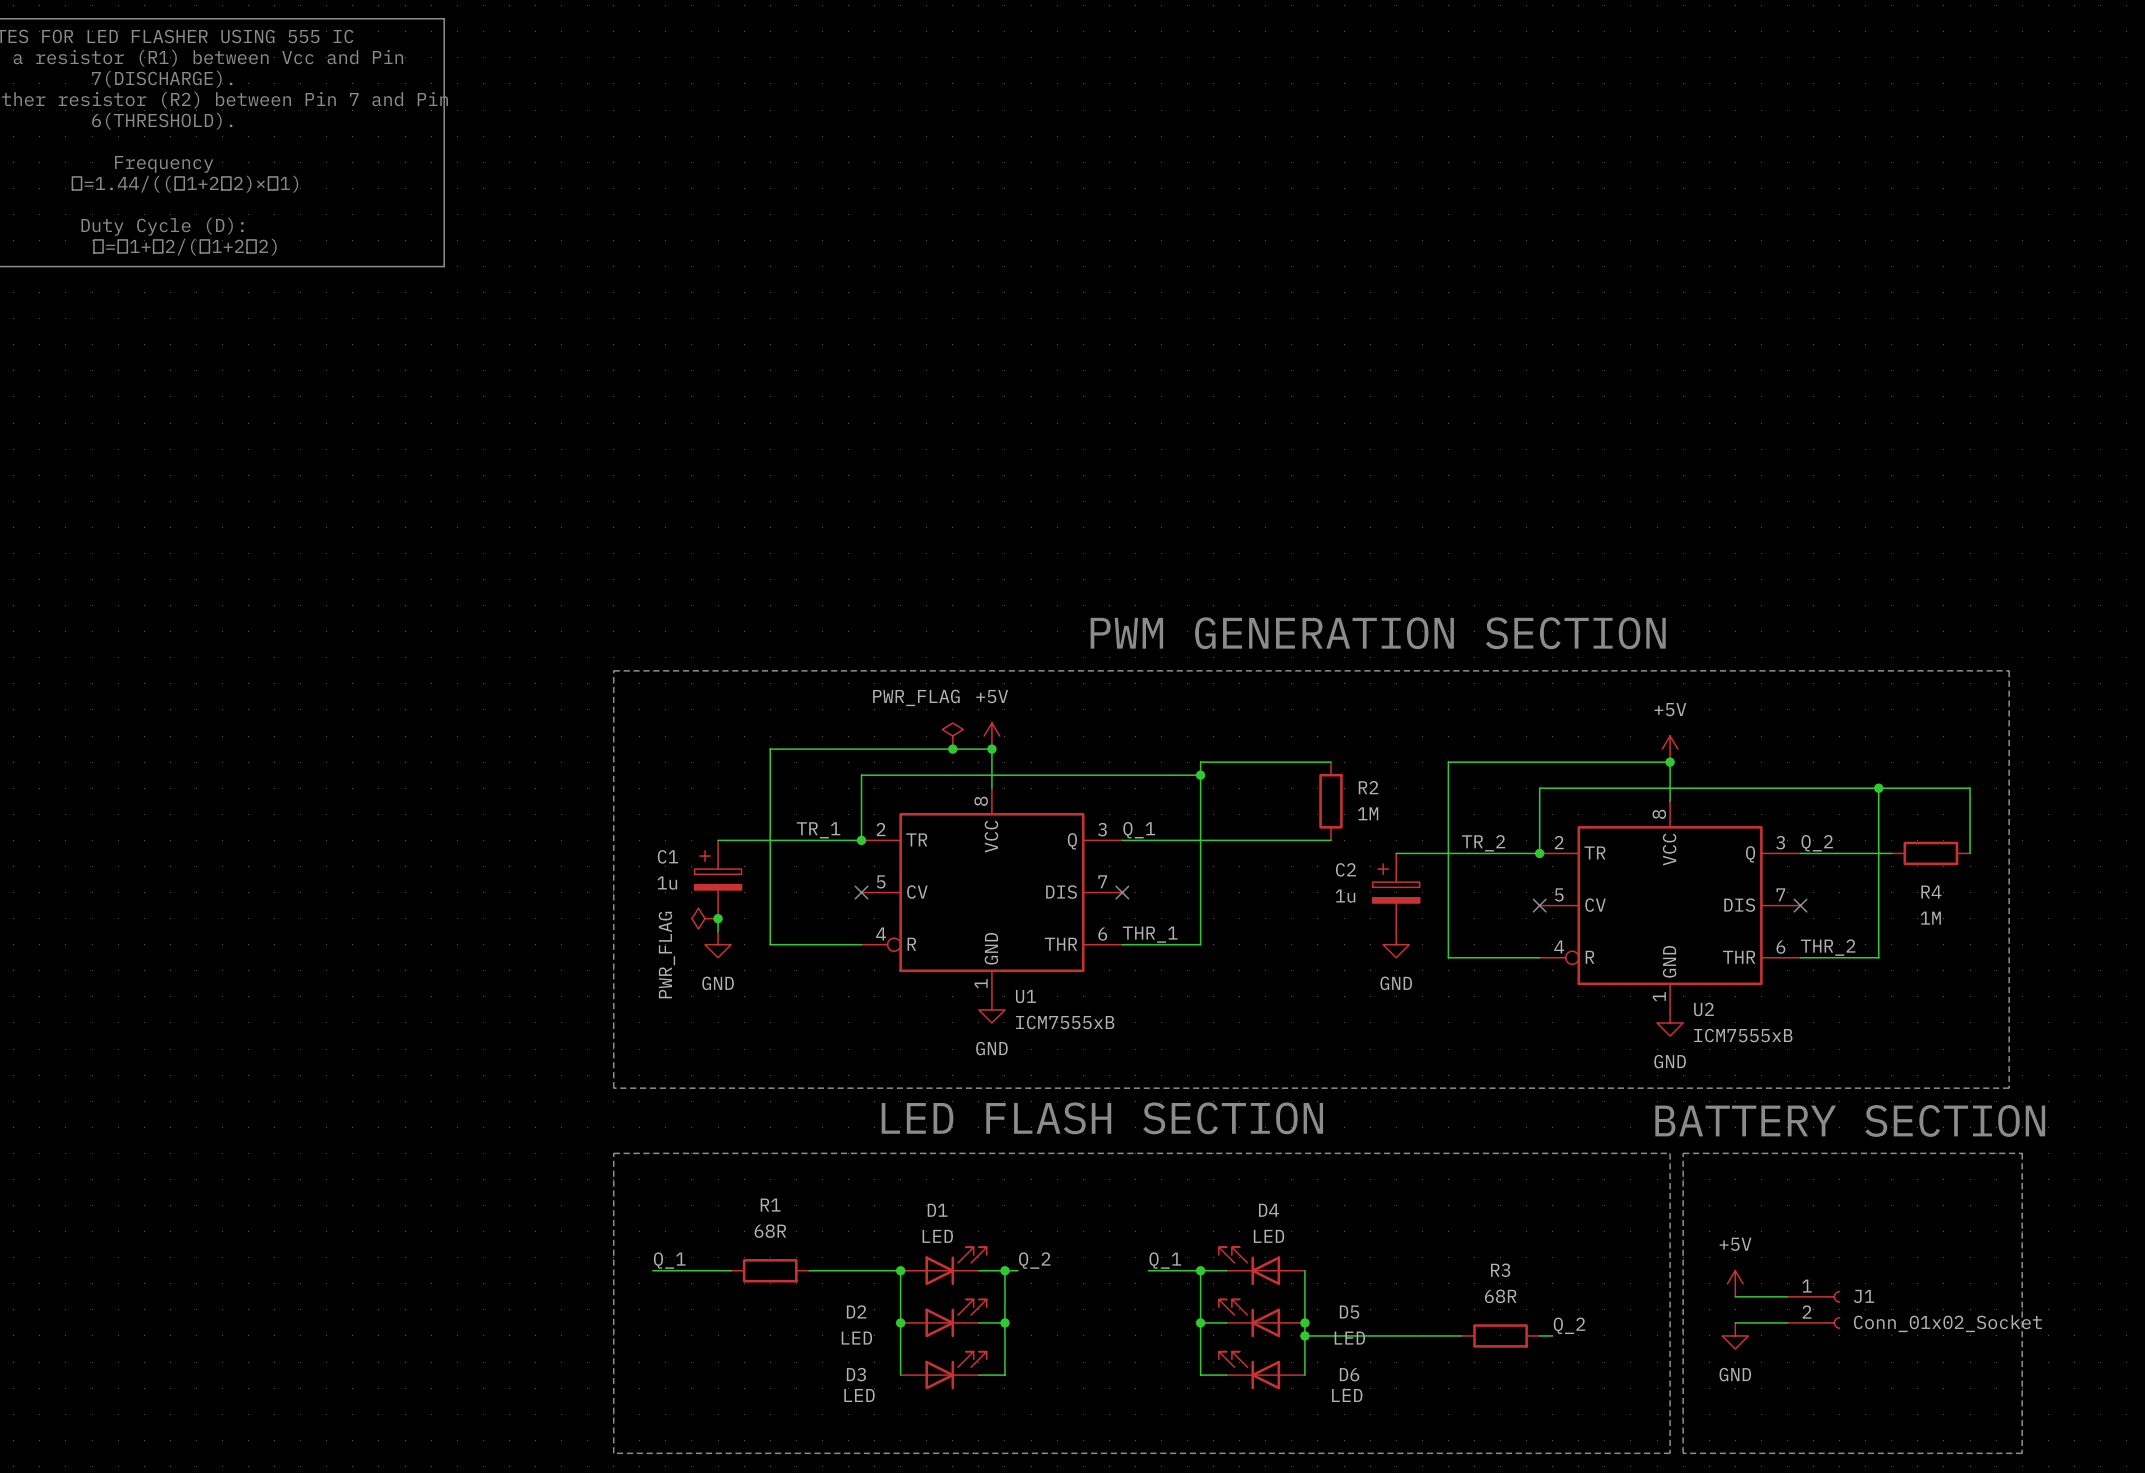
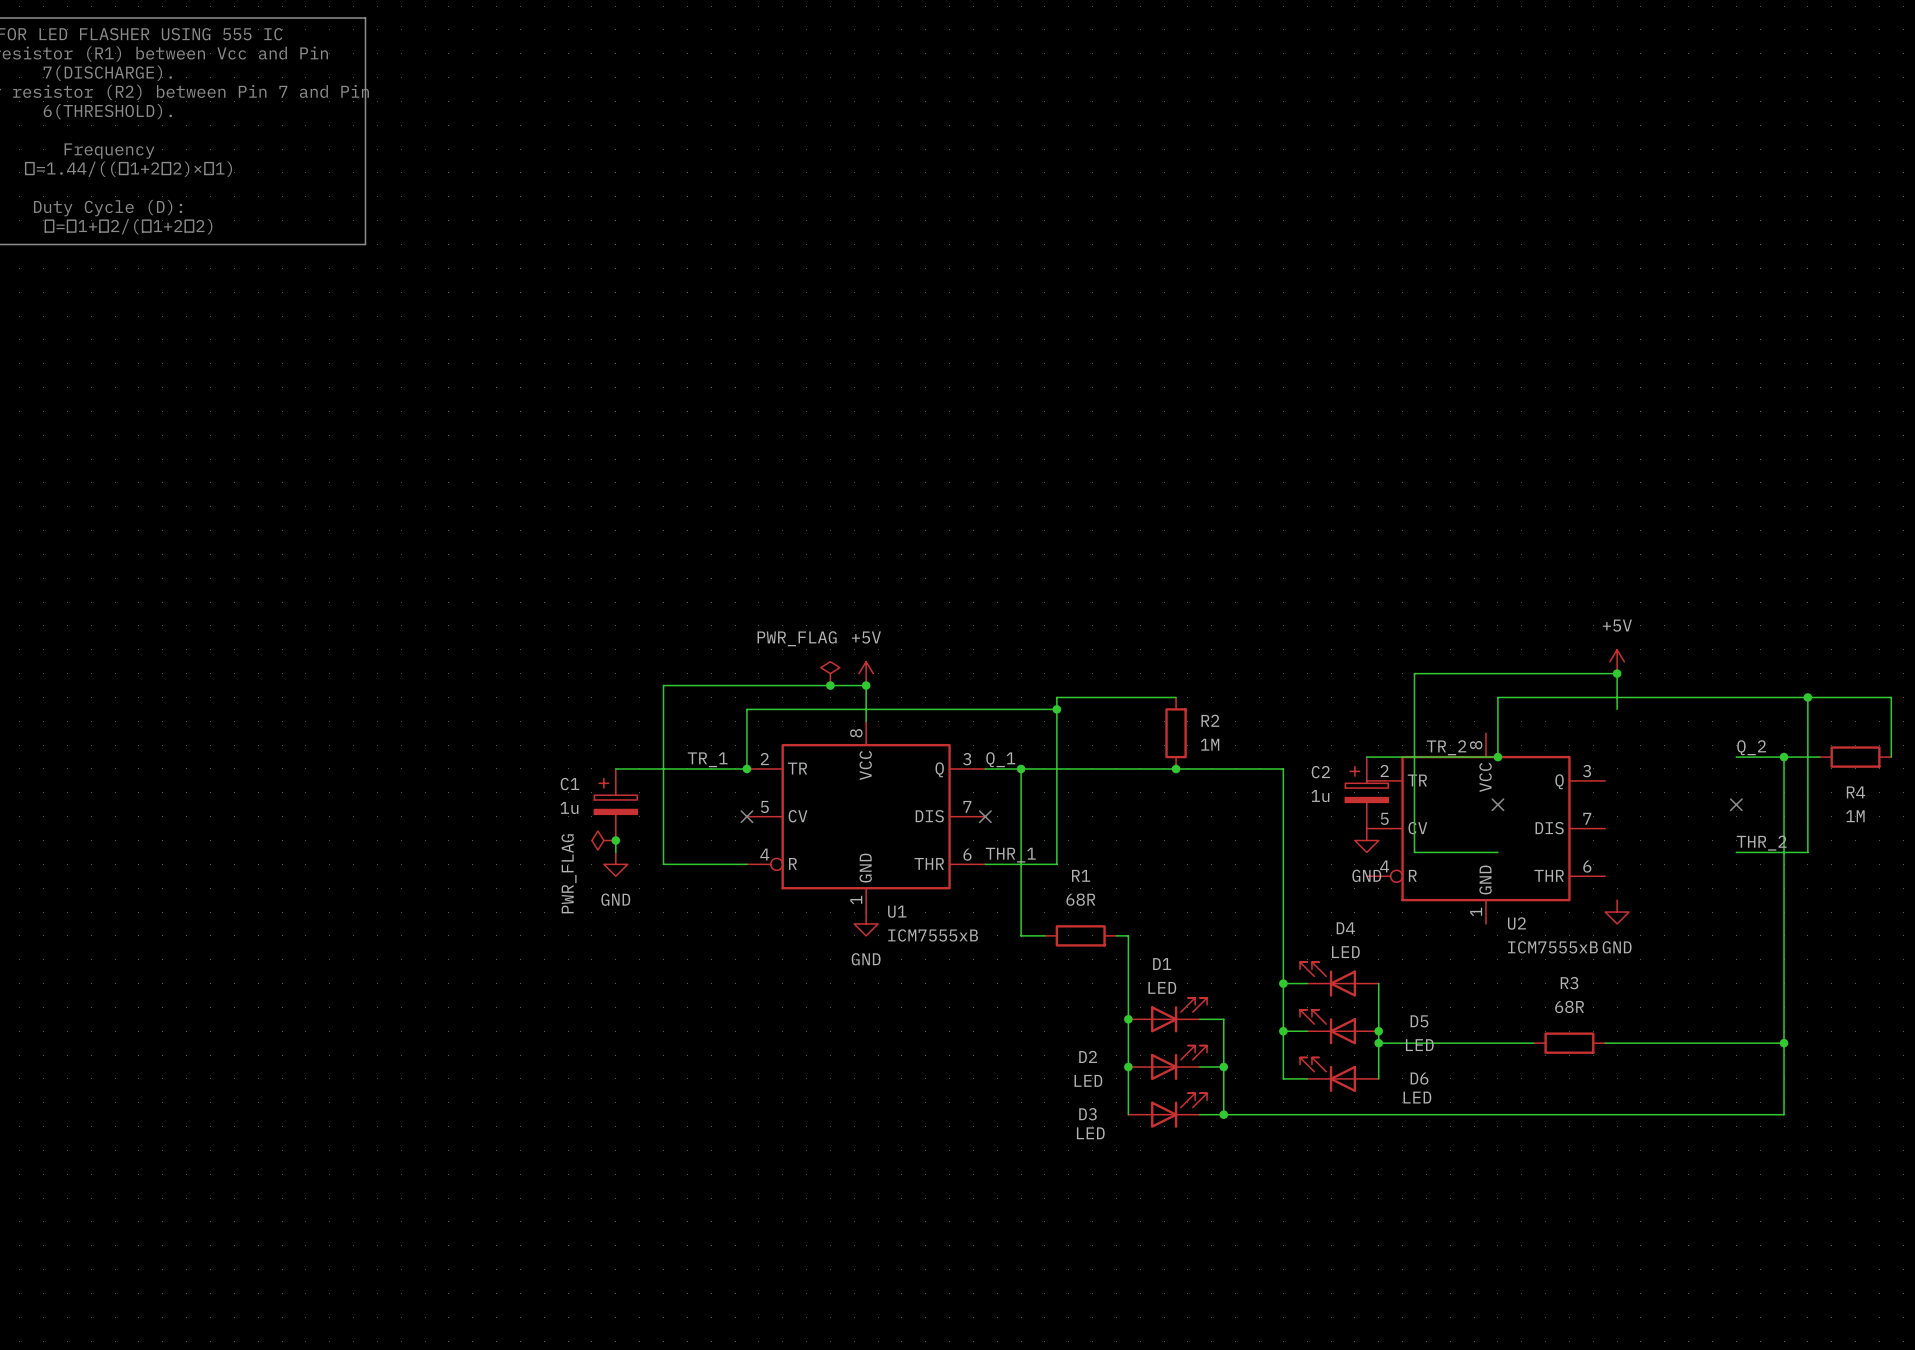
text: PWM GENERATION SECTION (1378, 633) -> none
line: (613, 670) (2009, 670) (2009, 1088) (613, 1088) (613, 670) -> none
junction: none -> (1617, 673)
power symbol position: +5V (1670, 749) -> +5V (1617, 661)
junction: (1670, 762) -> none
junction: none -> (1807, 697)
wire: none -> (1617, 709) (1617, 673) (1414, 673) (1414, 852) (1497, 852)
wire: (1878, 788) (1878, 957) (1800, 957) -> (1807, 697) (1807, 852) (1736, 852)
junction: (1878, 788) -> none
wire: (1670, 801) (1670, 762) (1448, 762) (1448, 840) -> (1176, 768) (1283, 768)
junction: none -> (1497, 757)
wire: none -> (1784, 757) (1784, 1114) (1199, 1114)
junction: none -> (1784, 757)
wire: none -> (1021, 768) (1021, 935) (1044, 935)
junction: none -> (1021, 768)
junction: none -> (1176, 768)
label position: TR_2 (1483, 843) -> TR_2 (1446, 747)
label position: Q_2 (1817, 843) -> Q_2 (1751, 747)
wire: (1396, 853) (1539, 853) (1539, 788) (1970, 788) (1970, 853) -> (1366, 757) (1497, 757) (1497, 697) (1891, 697) (1891, 757)
junction: (1539, 853) -> none
wire: (1800, 853) (1891, 853) -> (1736, 757) (1819, 757)
R4 position: (1930, 853) -> (1855, 757)
no-connect mark: none -> (1497, 804)
no-connect mark: none -> (1736, 804)
C2 position: (1396, 892) -> (1366, 792)
no-connect mark: (1539, 905) -> none
no-connect mark: (1800, 905) -> none
power symbol: none -> GND (1366, 840)
power symbol: GND (1396, 944) -> none
label position: THR_2 (1828, 947) -> THR_2 (1761, 843)
wire: (1448, 957) (1539, 957) -> (1283, 876) (1283, 1078) (1307, 1078)
power symbol: none -> GND (1617, 912)
wire: none -> (1116, 935) (1128, 935) (1128, 1114)
power symbol: GND (1670, 1022) -> none
wire: none -> (1283, 983) (1307, 983)
junction: none -> (1283, 983)
wire: none -> (1378, 983) (1378, 1078)
junction: none -> (1128, 1019)
wire: none -> (1199, 1019) (1223, 1019) (1223, 1114)
text: LED FLASH SECTION (1102, 1118) -> none
text: BATTERY SECTION (1850, 1120) -> none
wire: none -> (1283, 1031) (1307, 1031)
junction: none -> (1283, 1031)
junction: none -> (1378, 1031)
wire: none -> (1378, 1043) (1533, 1043)
junction: none -> (1378, 1043)
wire: none -> (1605, 1043) (1784, 1043)
junction: none -> (1784, 1043)
line: (613, 1153) (613, 1453) (1670, 1453) (1670, 1153) (613, 1153) -> none
line: (1683, 1153) (2022, 1153) (2022, 1453) (1683, 1453) (1683, 1153) -> none
junction: none -> (1128, 1067)
junction: none -> (1223, 1067)
junction: none -> (1223, 1114)
label: Q_1 (669, 1260) -> none
label: Q_2 (1034, 1260) -> none
label: Q_1 (1165, 1260) -> none
D1 position: (943, 1266) -> (1167, 1015)
D4 position: (1261, 1266) -> (1339, 979)
wire: (652, 1270) (731, 1270) -> none
R1 position: (770, 1270) -> (1080, 935)
wire: (809, 1270) (900, 1270) (900, 1375) -> none
junction: (900, 1270) -> none
wire: (978, 1270) (1018, 1270) -> none
wire: (1004, 1270) (1004, 1375) (978, 1375) -> none
junction: (1004, 1270) -> none
wire: (1148, 1270) (1226, 1270) -> none
wire: (1200, 1270) (1200, 1375) (1226, 1375) -> none
junction: (1200, 1270) -> none
wire: (1304, 1270) (1304, 1375) -> none
power symbol: +5V (1735, 1283) -> none
wire: (1735, 1296) (1787, 1296) -> none
J1: Conn_01x02_Socket (1813, 1309) -> none
D2 position: (943, 1318) -> (1167, 1062)
D5 position: (1261, 1318) -> (1339, 1027)
junction: (900, 1322) -> none
wire: (978, 1322) (1004, 1322) -> none
junction: (1004, 1322) -> none
wire: (1200, 1322) (1226, 1322) -> (1199, 1067) (1223, 1067)
junction: (1200, 1322) -> none
junction: (1304, 1322) -> none
wire: (1735, 1322) (1787, 1322) -> none
label: Q_2 (1569, 1325) -> none
wire: (1304, 1335) (1461, 1335) -> none
junction: (1304, 1335) -> none
R3 position: (1500, 1335) -> (1569, 1043)
wire: (1539, 1335) (1552, 1335) -> none
power symbol: GND (1735, 1335) -> none
D3 position: (943, 1370) -> (1167, 1110)
D6 position: (1261, 1370) -> (1339, 1074)

